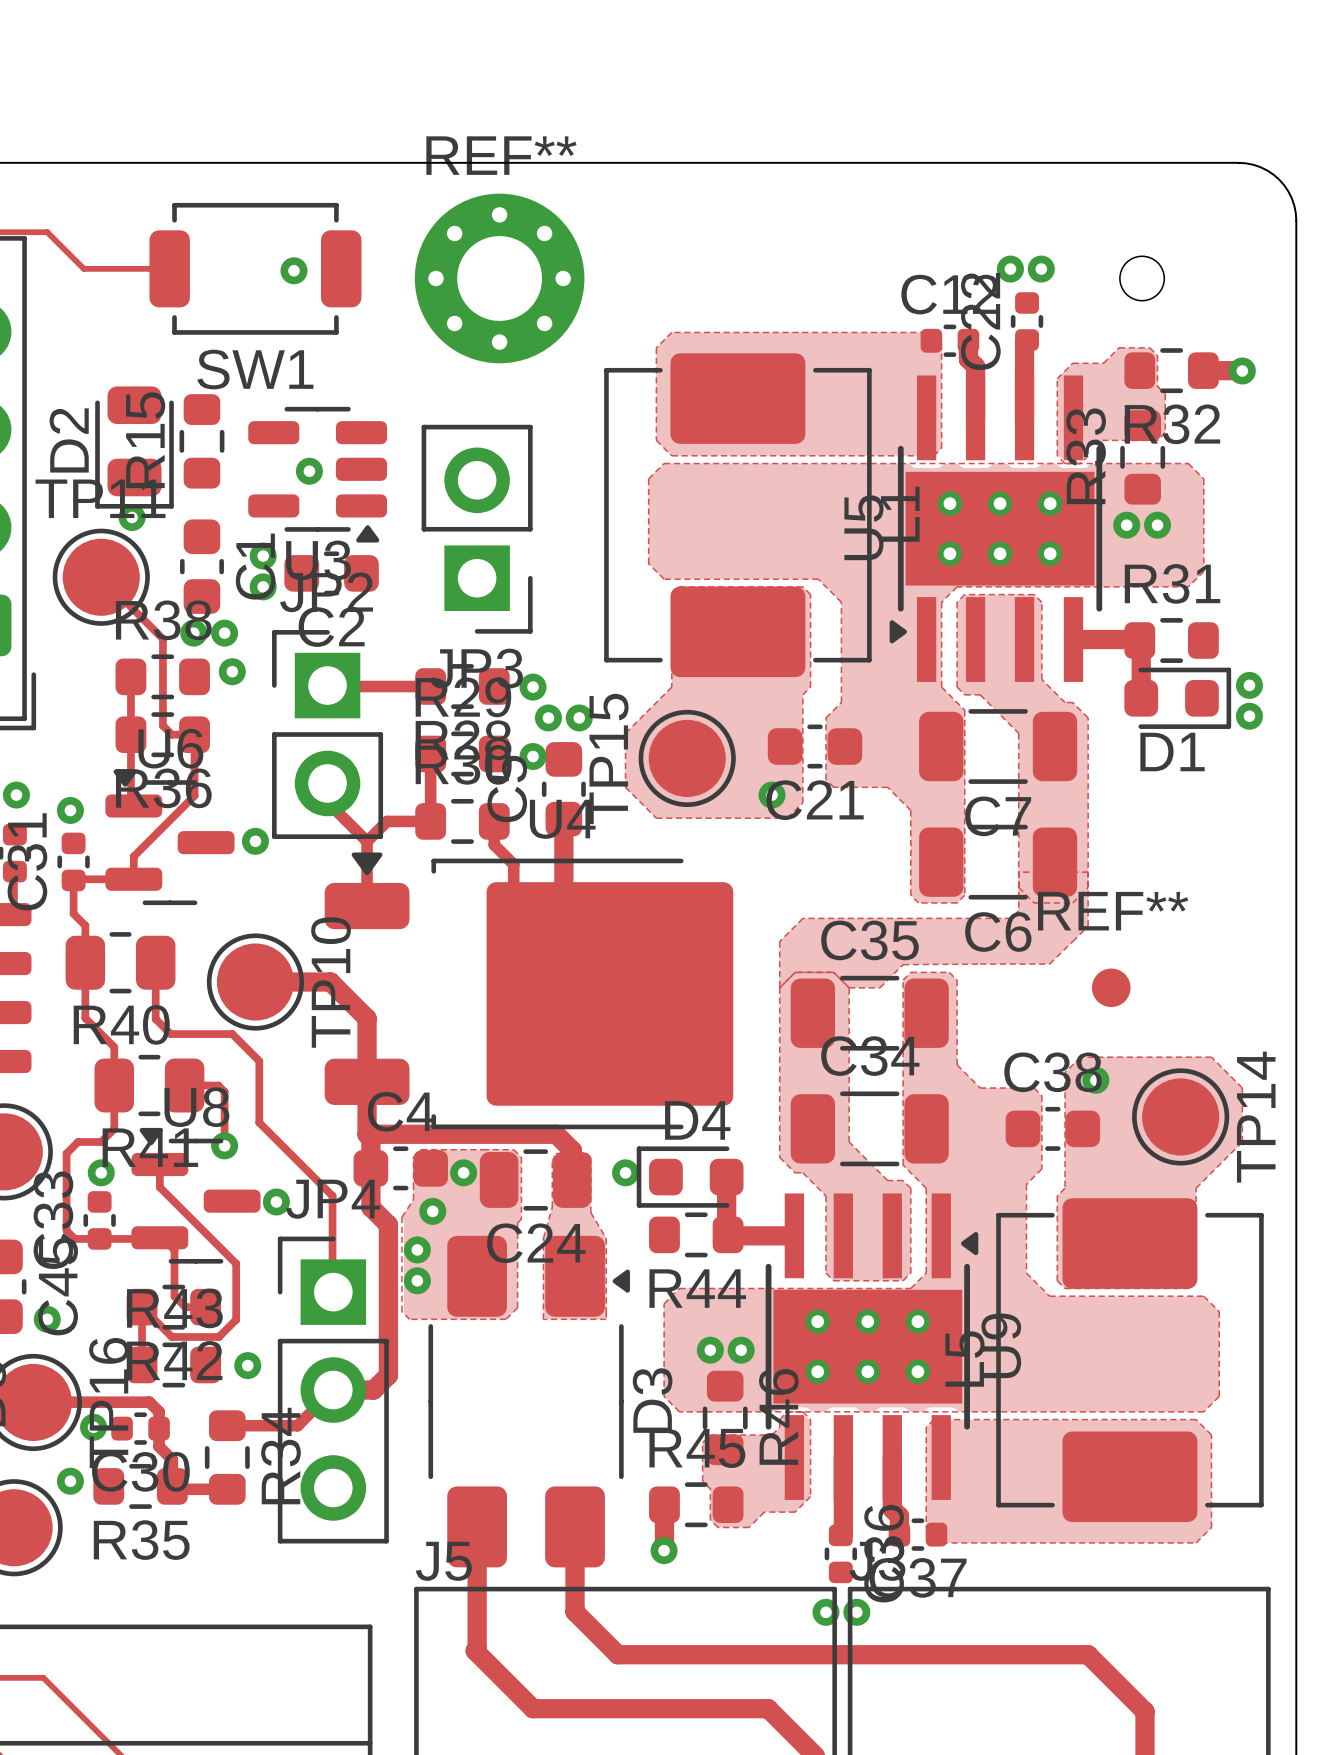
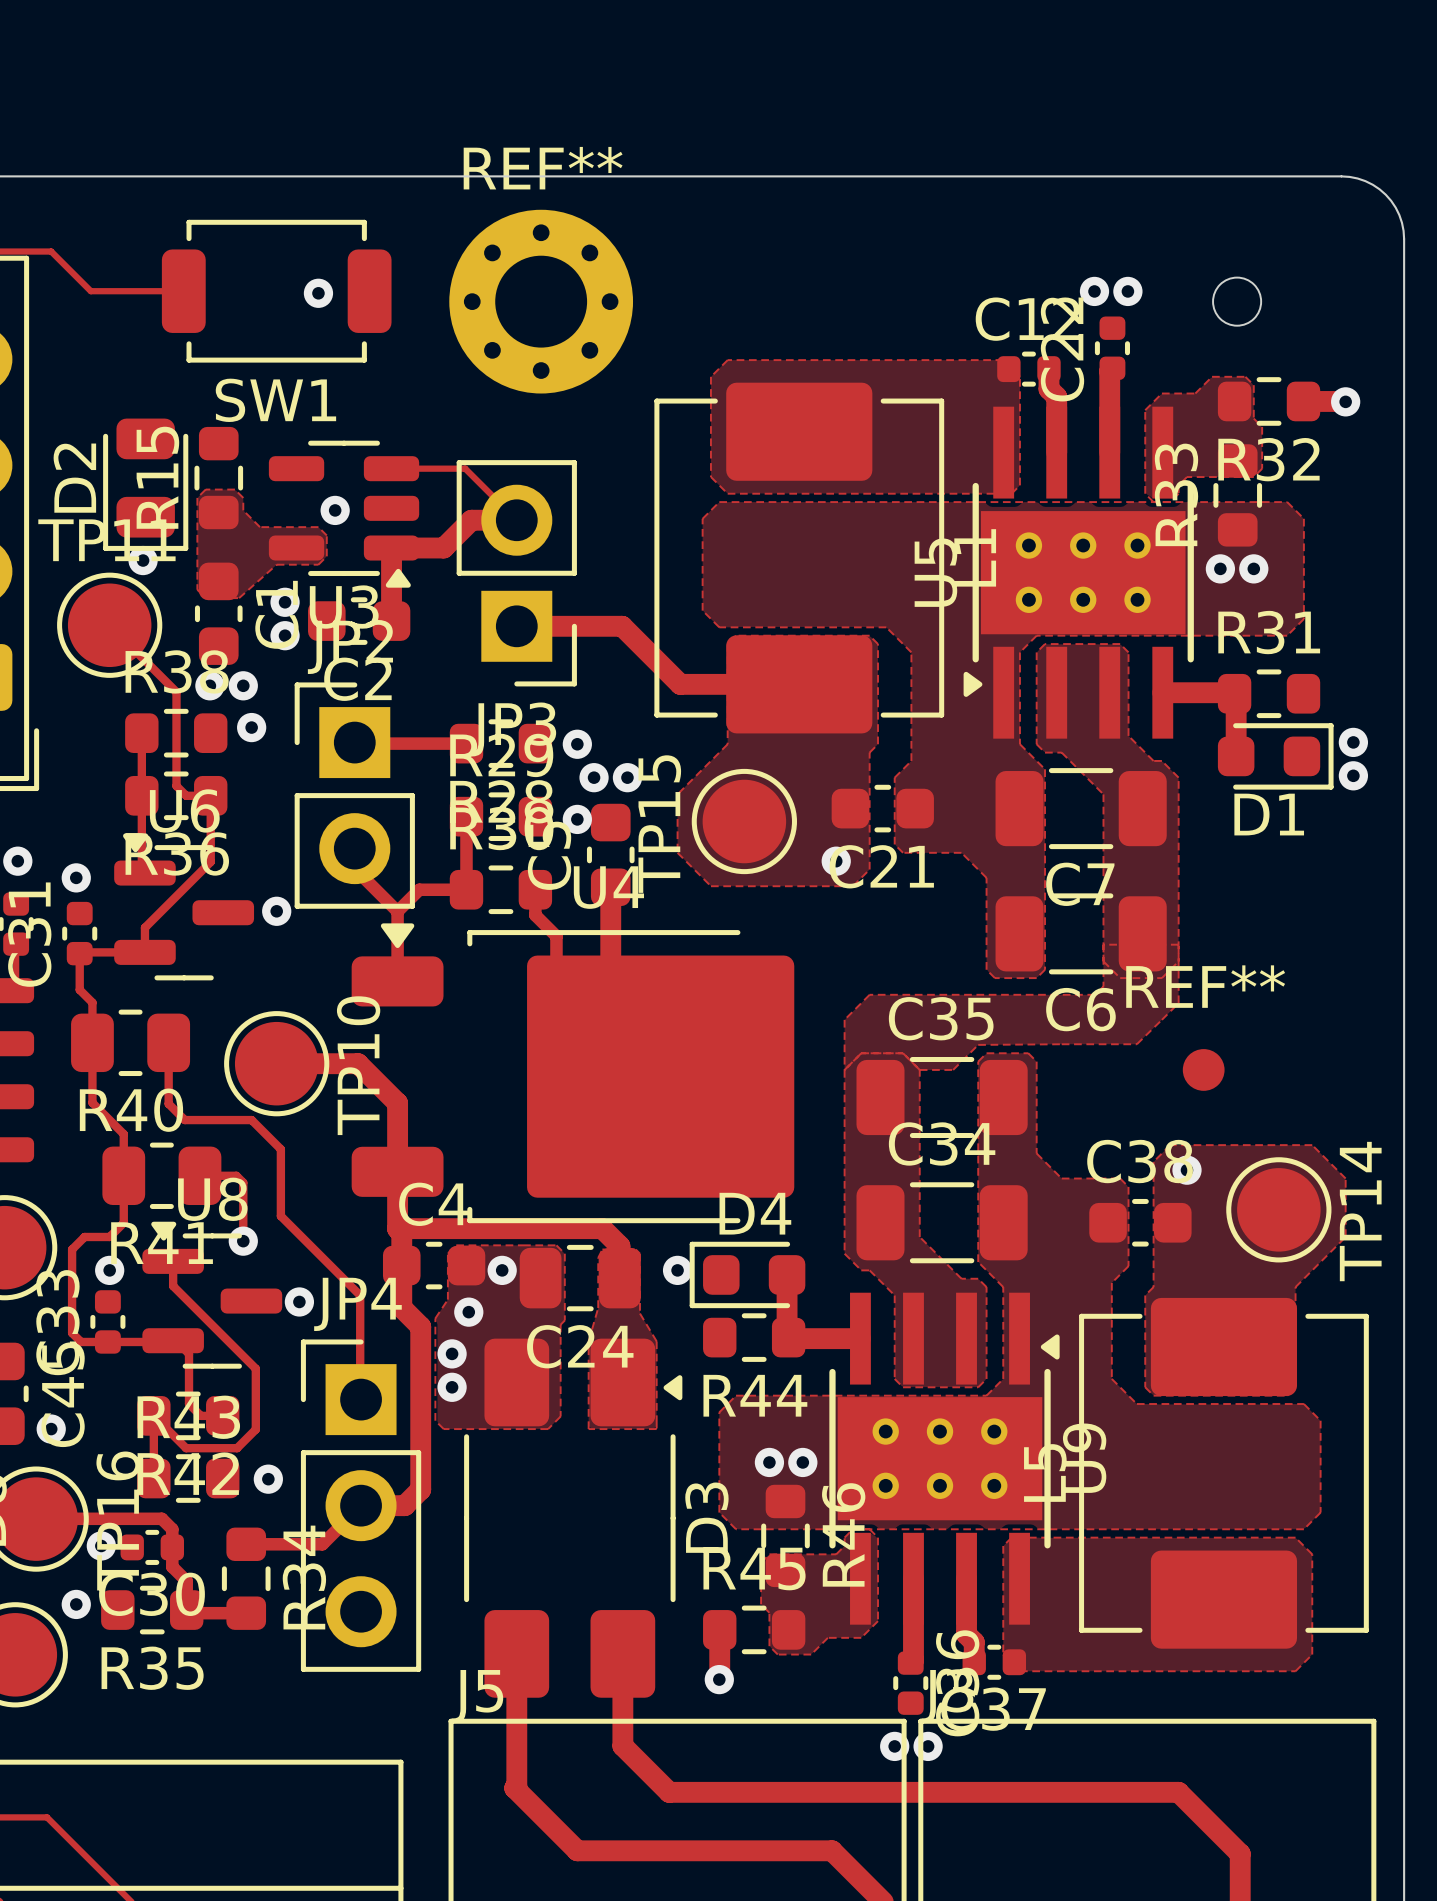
track: none -> (391, 468) (465, 468) (516, 520) (471, 520) (443, 548) (391, 548) (391, 621)
zone outline: none -> (205, 489) (234, 489) (243, 497) (243, 510) (260, 527) (318, 527) (326, 535) (326, 556) (318, 564) (276, 564) (239, 598) (205, 598) (197, 589) (197, 497) (205, 489)
track: none -> (516, 626) (622, 626) (680, 684) (799, 684)

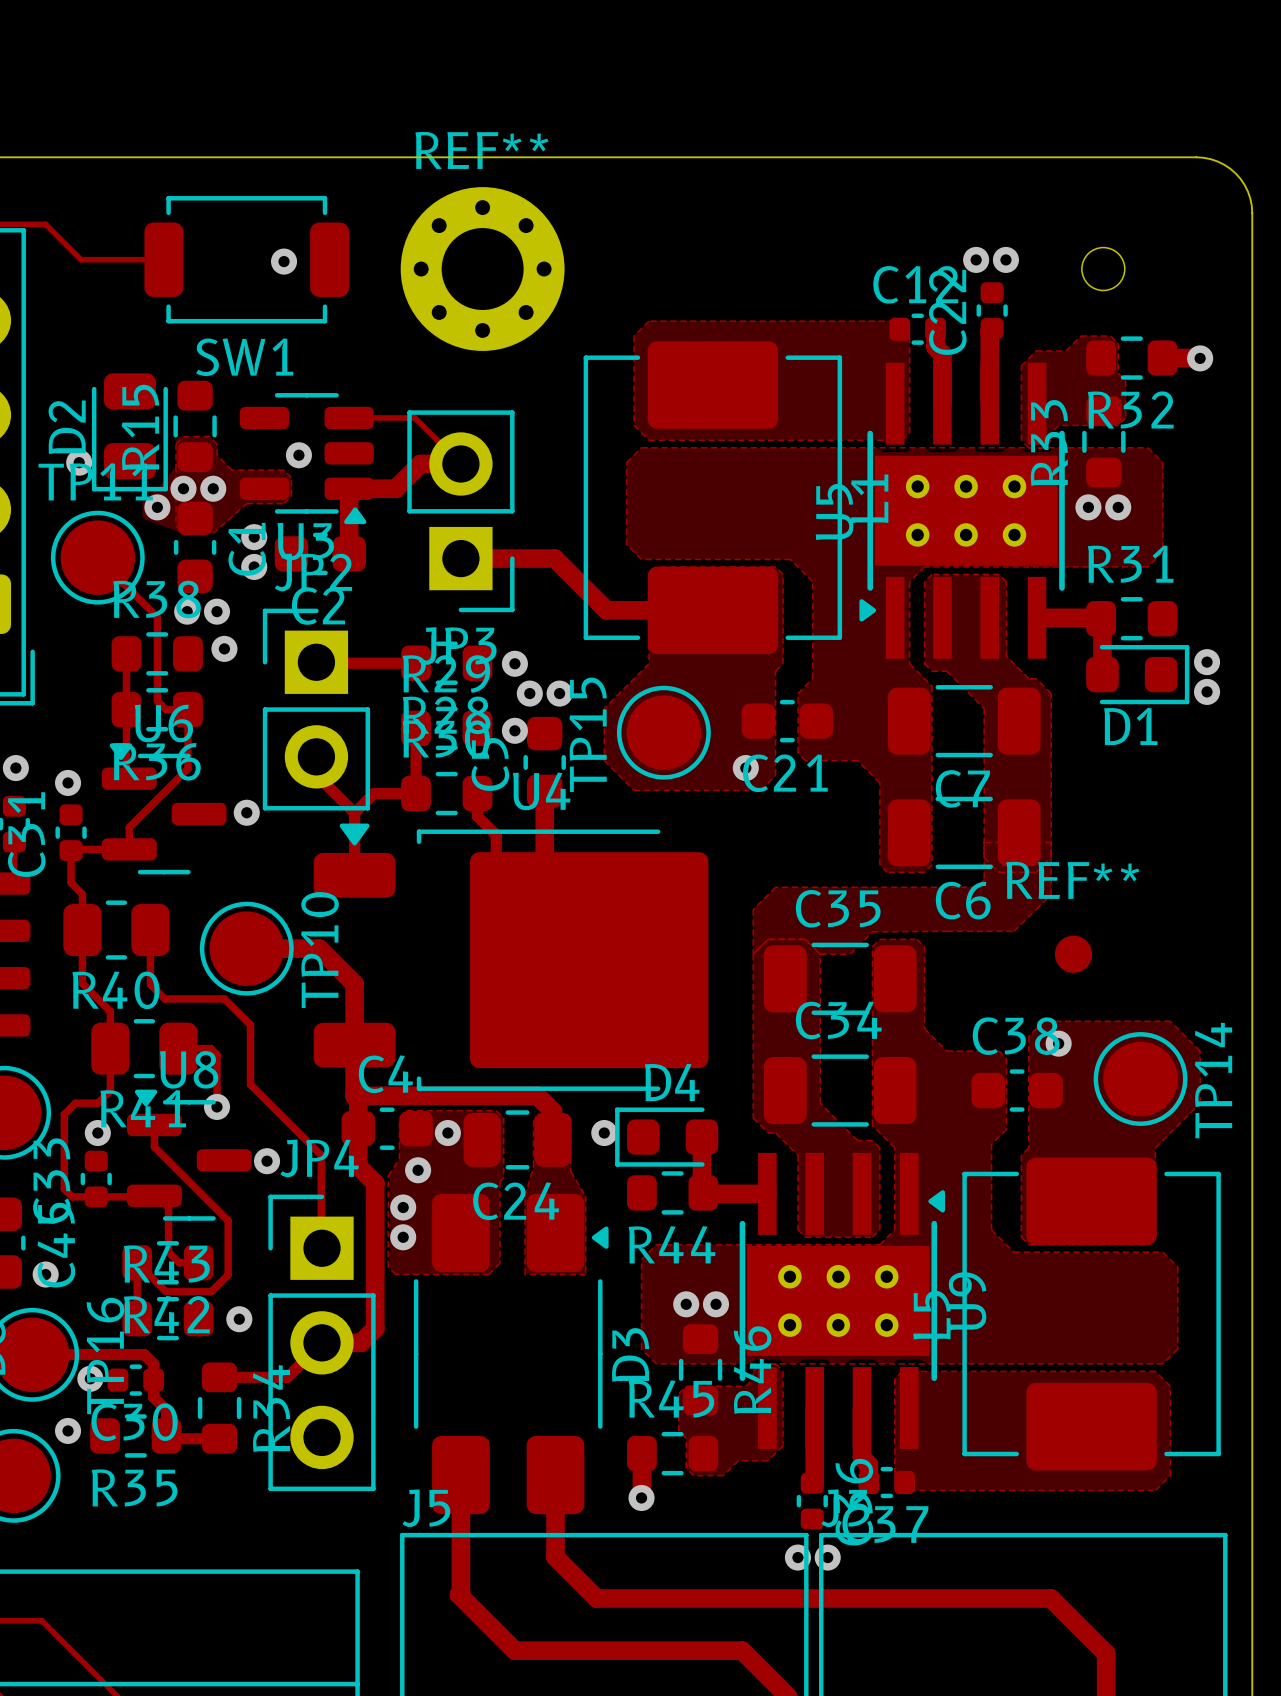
via: none -> (79, 462)
via: none -> (183, 488)
via: none -> (213, 488)
via: (143, 560) -> none
via: none -> (157, 507)

